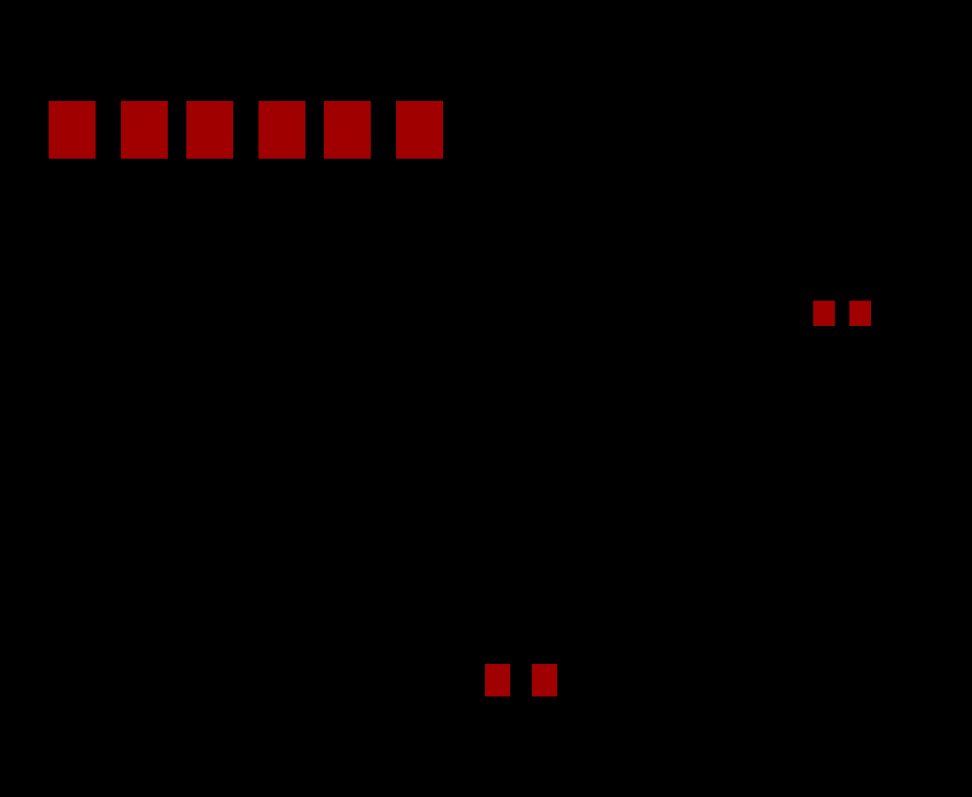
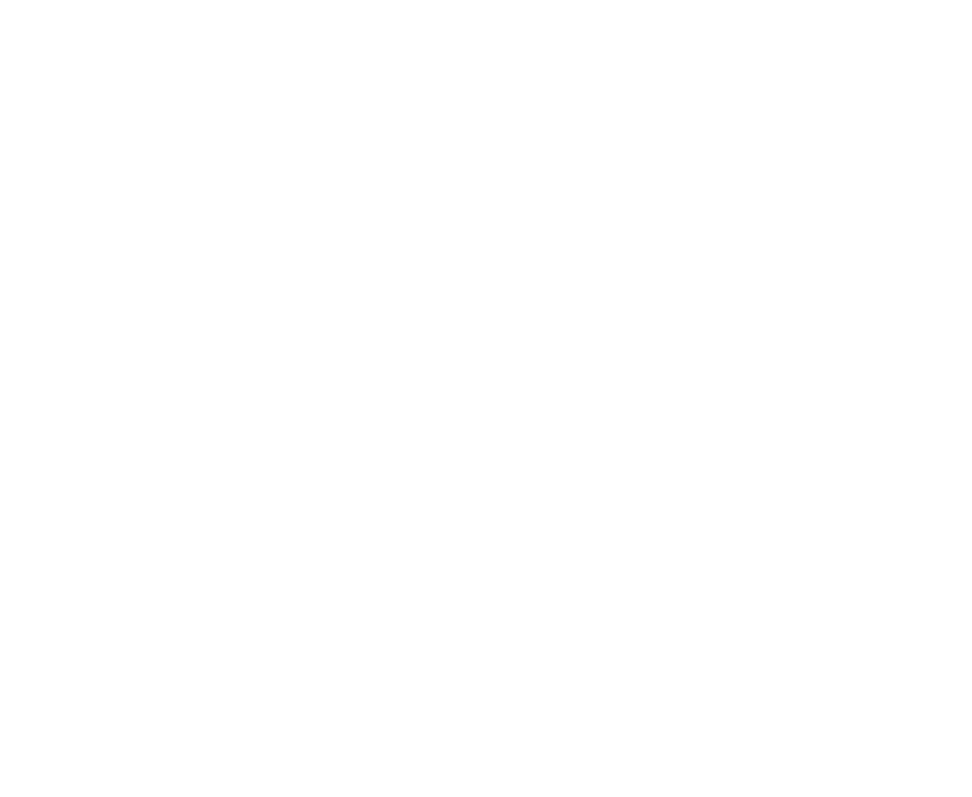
part: (108, 129) -> none
part: (245, 129) -> none
part: (383, 129) -> none
part: (842, 313) -> none
part: (521, 680) -> none

